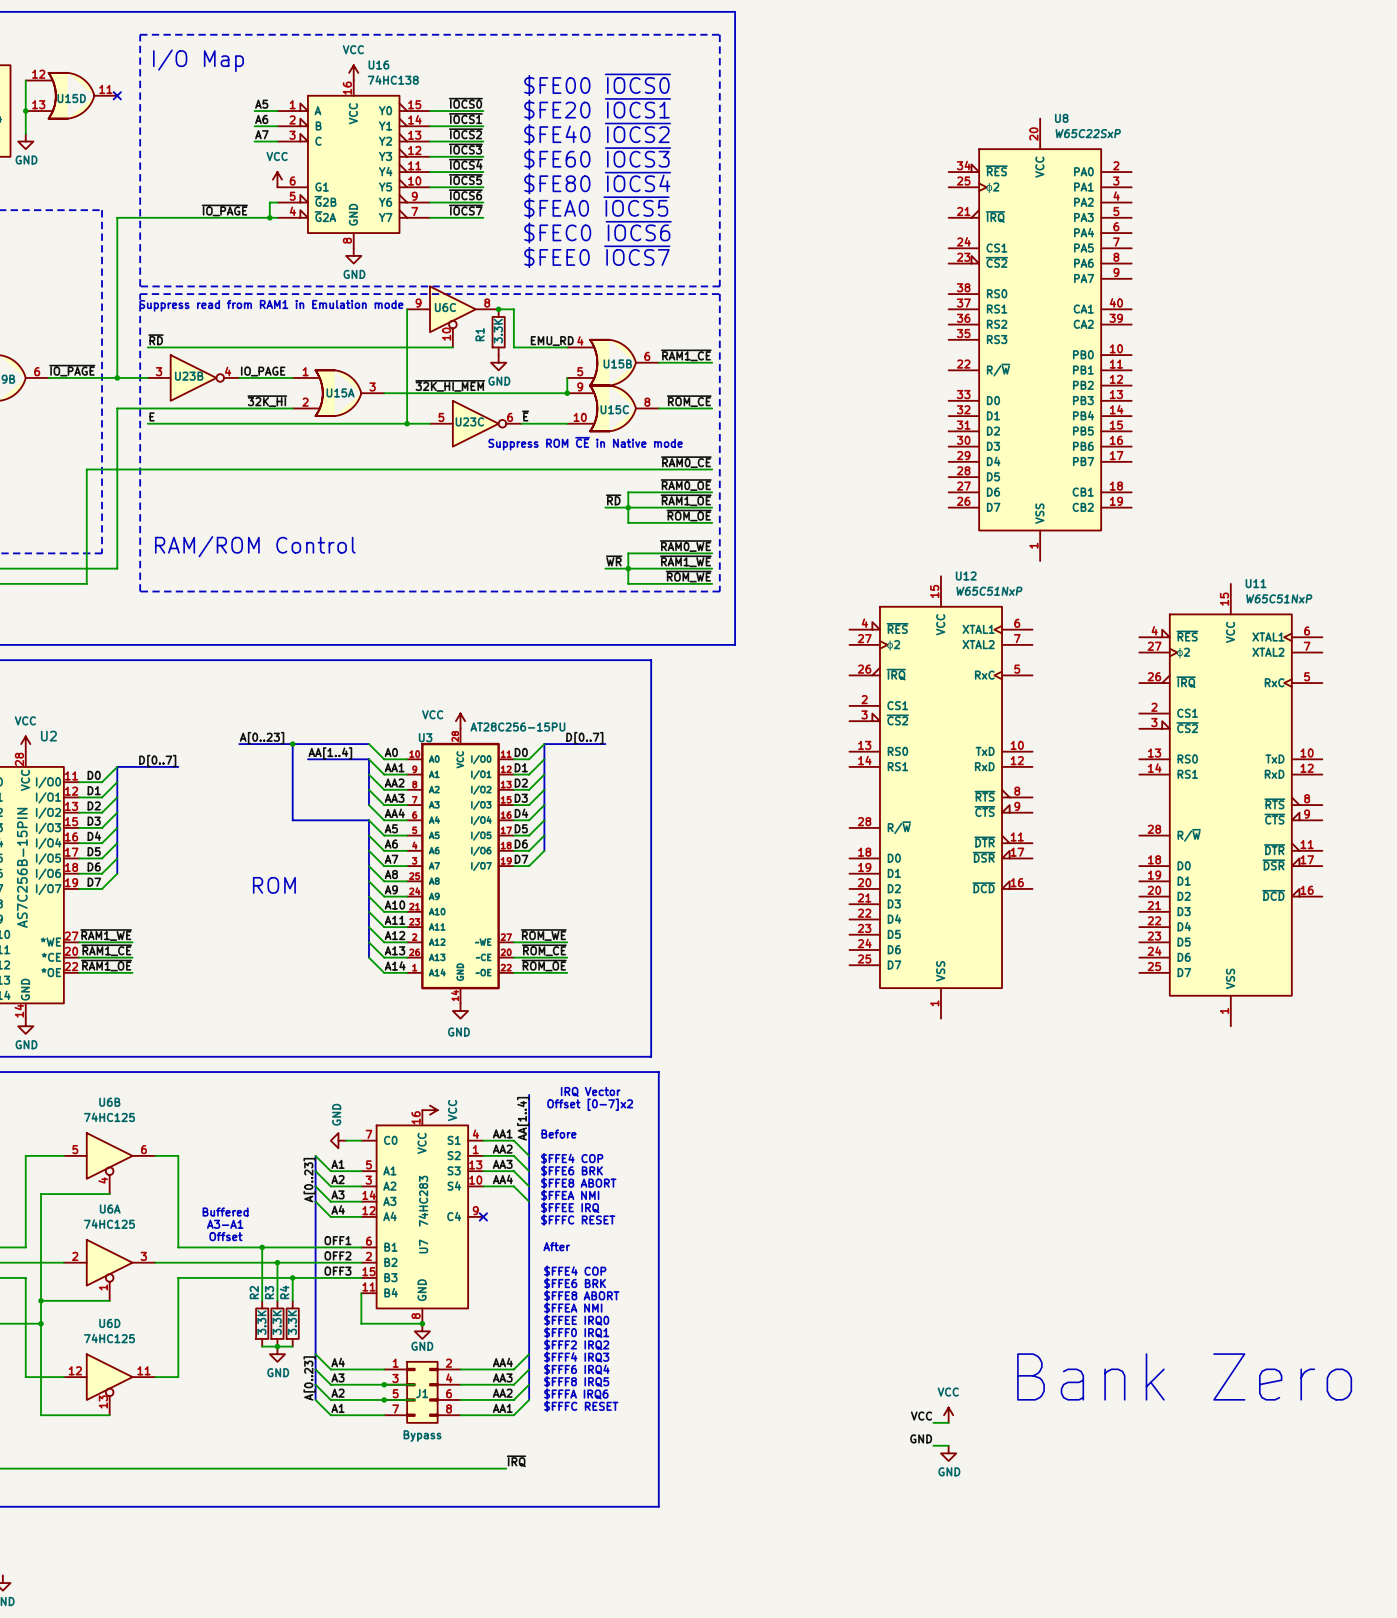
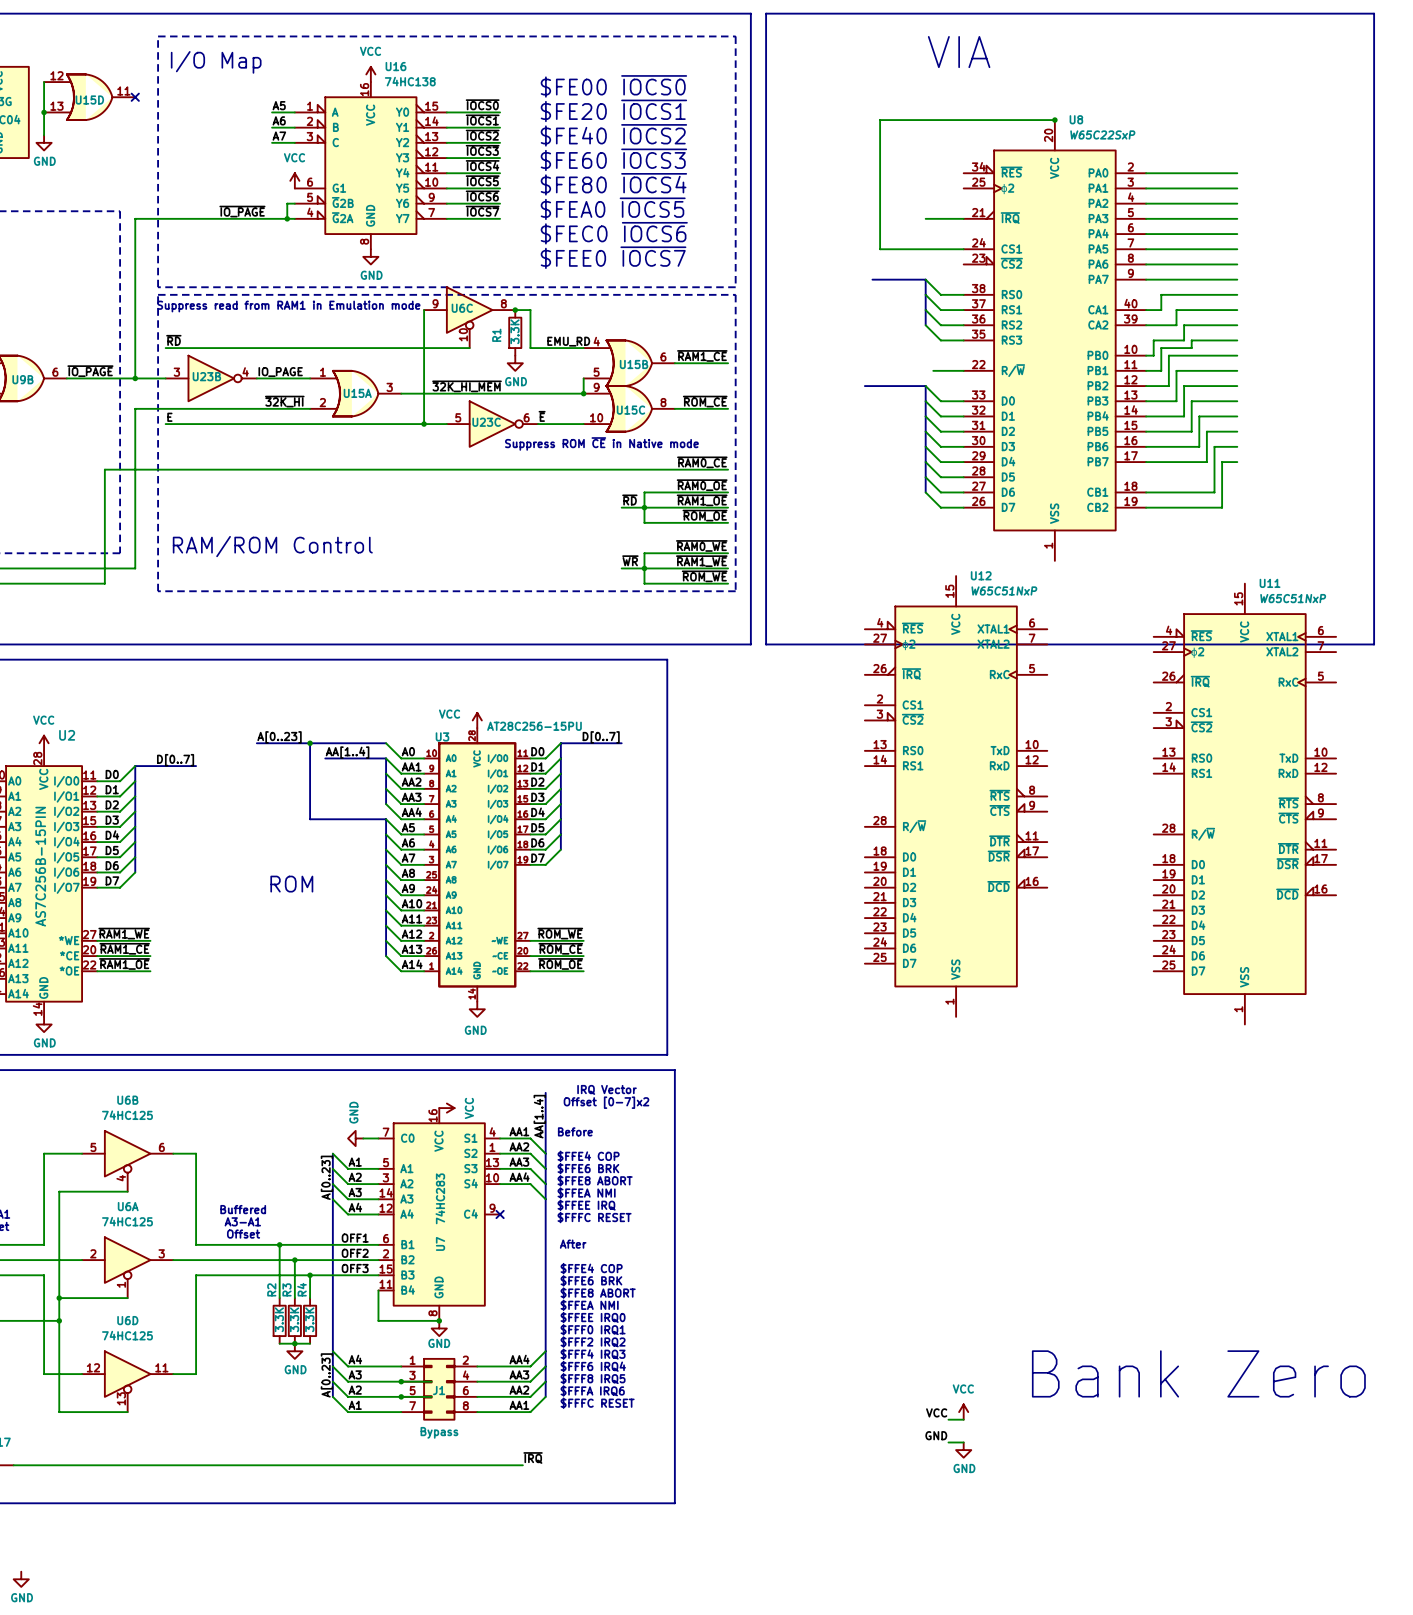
line: none -> (766, 13) (1374, 13) (1374, 644) (766, 644) (766, 13)
text: none -> VIA (959, 52)
wire: none -> (1054, 120) (880, 120) (880, 249) (963, 249)
junction: none -> (1054, 120)
wire: none -> (1146, 173) (1237, 173)
wire: none -> (1146, 188) (1237, 188)
wire: none -> (1146, 203) (1237, 203)
wire: none -> (925, 218) (963, 218)
wire: none -> (1146, 218) (1237, 218)
wire: none -> (1146, 234) (1237, 234)
wire: none -> (1146, 249) (1237, 249)
wire: none -> (1146, 264) (1237, 264)
bus: none -> (872, 279) (925, 279) (925, 325)
wire: none -> (925, 279) (940, 294) (963, 294)
wire: none -> (1146, 279) (1237, 279)
wire: none -> (925, 294) (940, 310) (963, 310)
wire: none -> (1237, 294) (1161, 294) (1161, 310) (1146, 310)
wire: none -> (925, 310) (940, 325) (963, 325)
wire: none -> (1237, 310) (1176, 310) (1176, 325) (1146, 325)
wire: none -> (925, 325) (940, 340) (963, 340)
wire: none -> (1237, 325) (1184, 325) (1184, 340) (1153, 340) (1153, 355) (1146, 355)
wire: none -> (1237, 340) (1191, 340) (1191, 348) (1161, 348) (1161, 370) (1146, 370)
wire: none -> (1237, 355) (1168, 355) (1168, 386) (1146, 386)
wire: none -> (933, 370) (963, 370)
wire: none -> (1237, 370) (1176, 370) (1176, 401) (1146, 401)
bus: none -> (864, 386) (925, 386) (925, 492)
wire: none -> (925, 386) (940, 401) (963, 401)
wire: none -> (1237, 386) (1184, 386) (1184, 416) (1146, 416)
wire: none -> (925, 401) (940, 416) (963, 416)
wire: none -> (1237, 401) (1191, 401) (1191, 431) (1146, 431)
wire: none -> (925, 416) (940, 431) (963, 431)
wire: none -> (1237, 416) (1199, 416) (1199, 446) (1146, 446)
wire: none -> (925, 431) (940, 446) (963, 446)
wire: none -> (1237, 431) (1206, 431) (1206, 462) (1146, 462)
wire: none -> (925, 446) (940, 462) (963, 462)
wire: none -> (1237, 446) (1214, 446) (1214, 492) (1146, 492)
wire: none -> (925, 462) (940, 477) (963, 477)
wire: none -> (1237, 462) (1222, 462) (1222, 507) (1146, 507)
wire: none -> (925, 477) (940, 492) (963, 492)
wire: none -> (925, 492) (940, 507) (963, 507)

